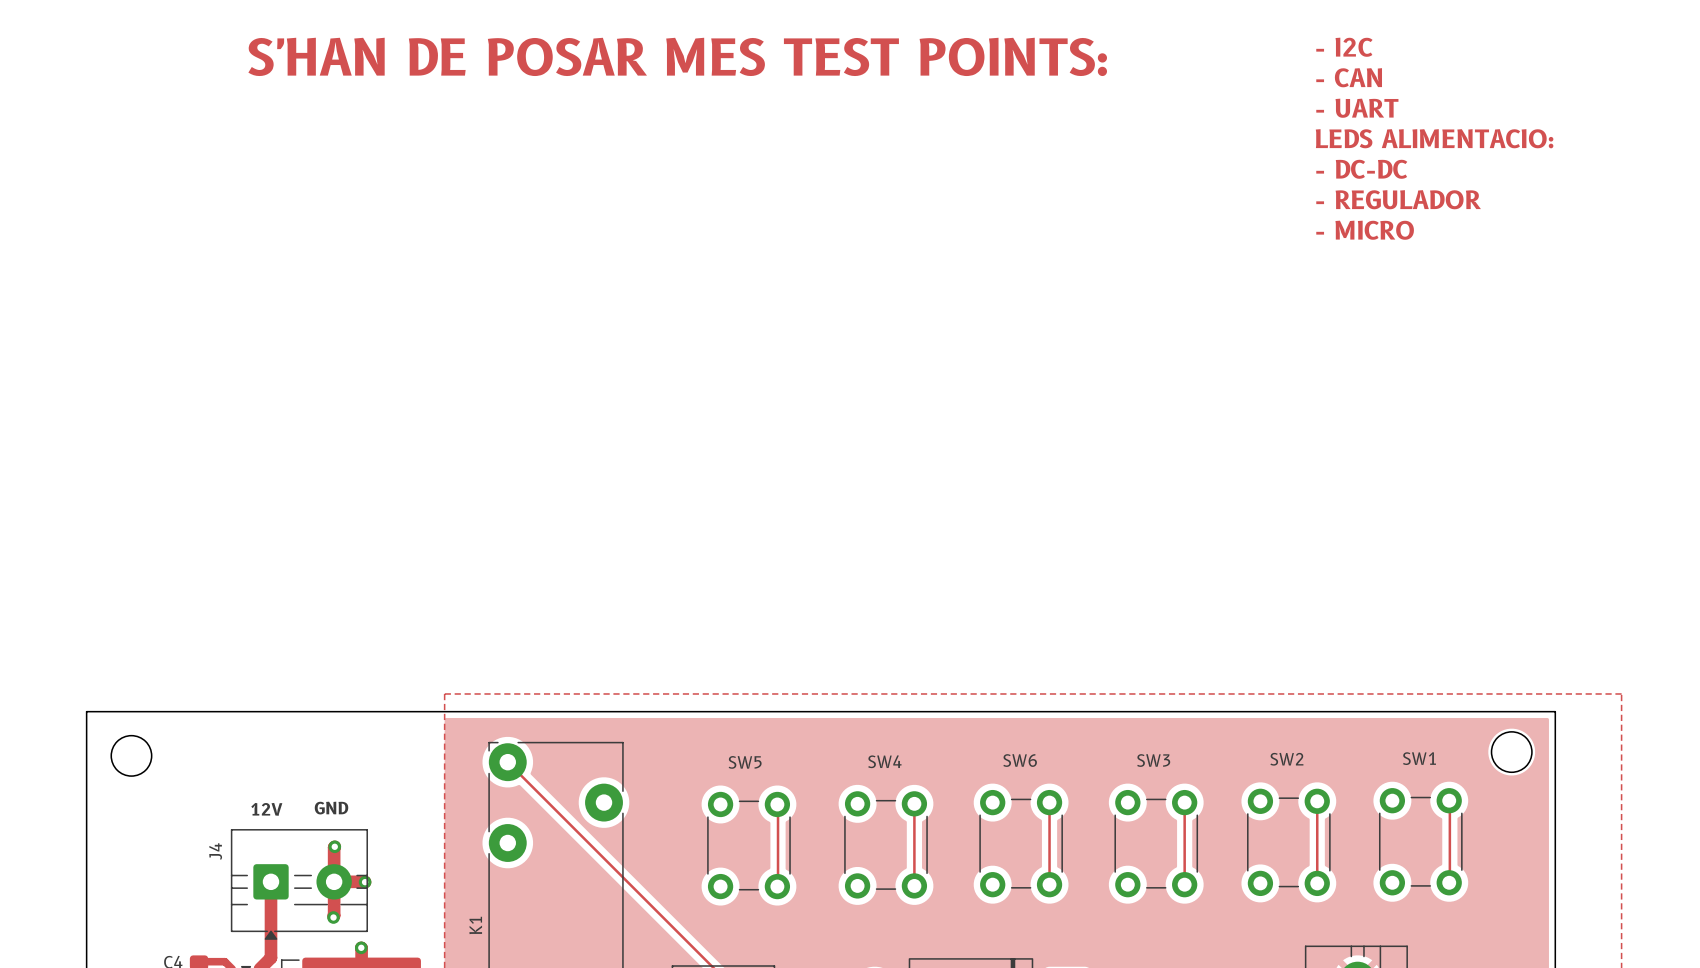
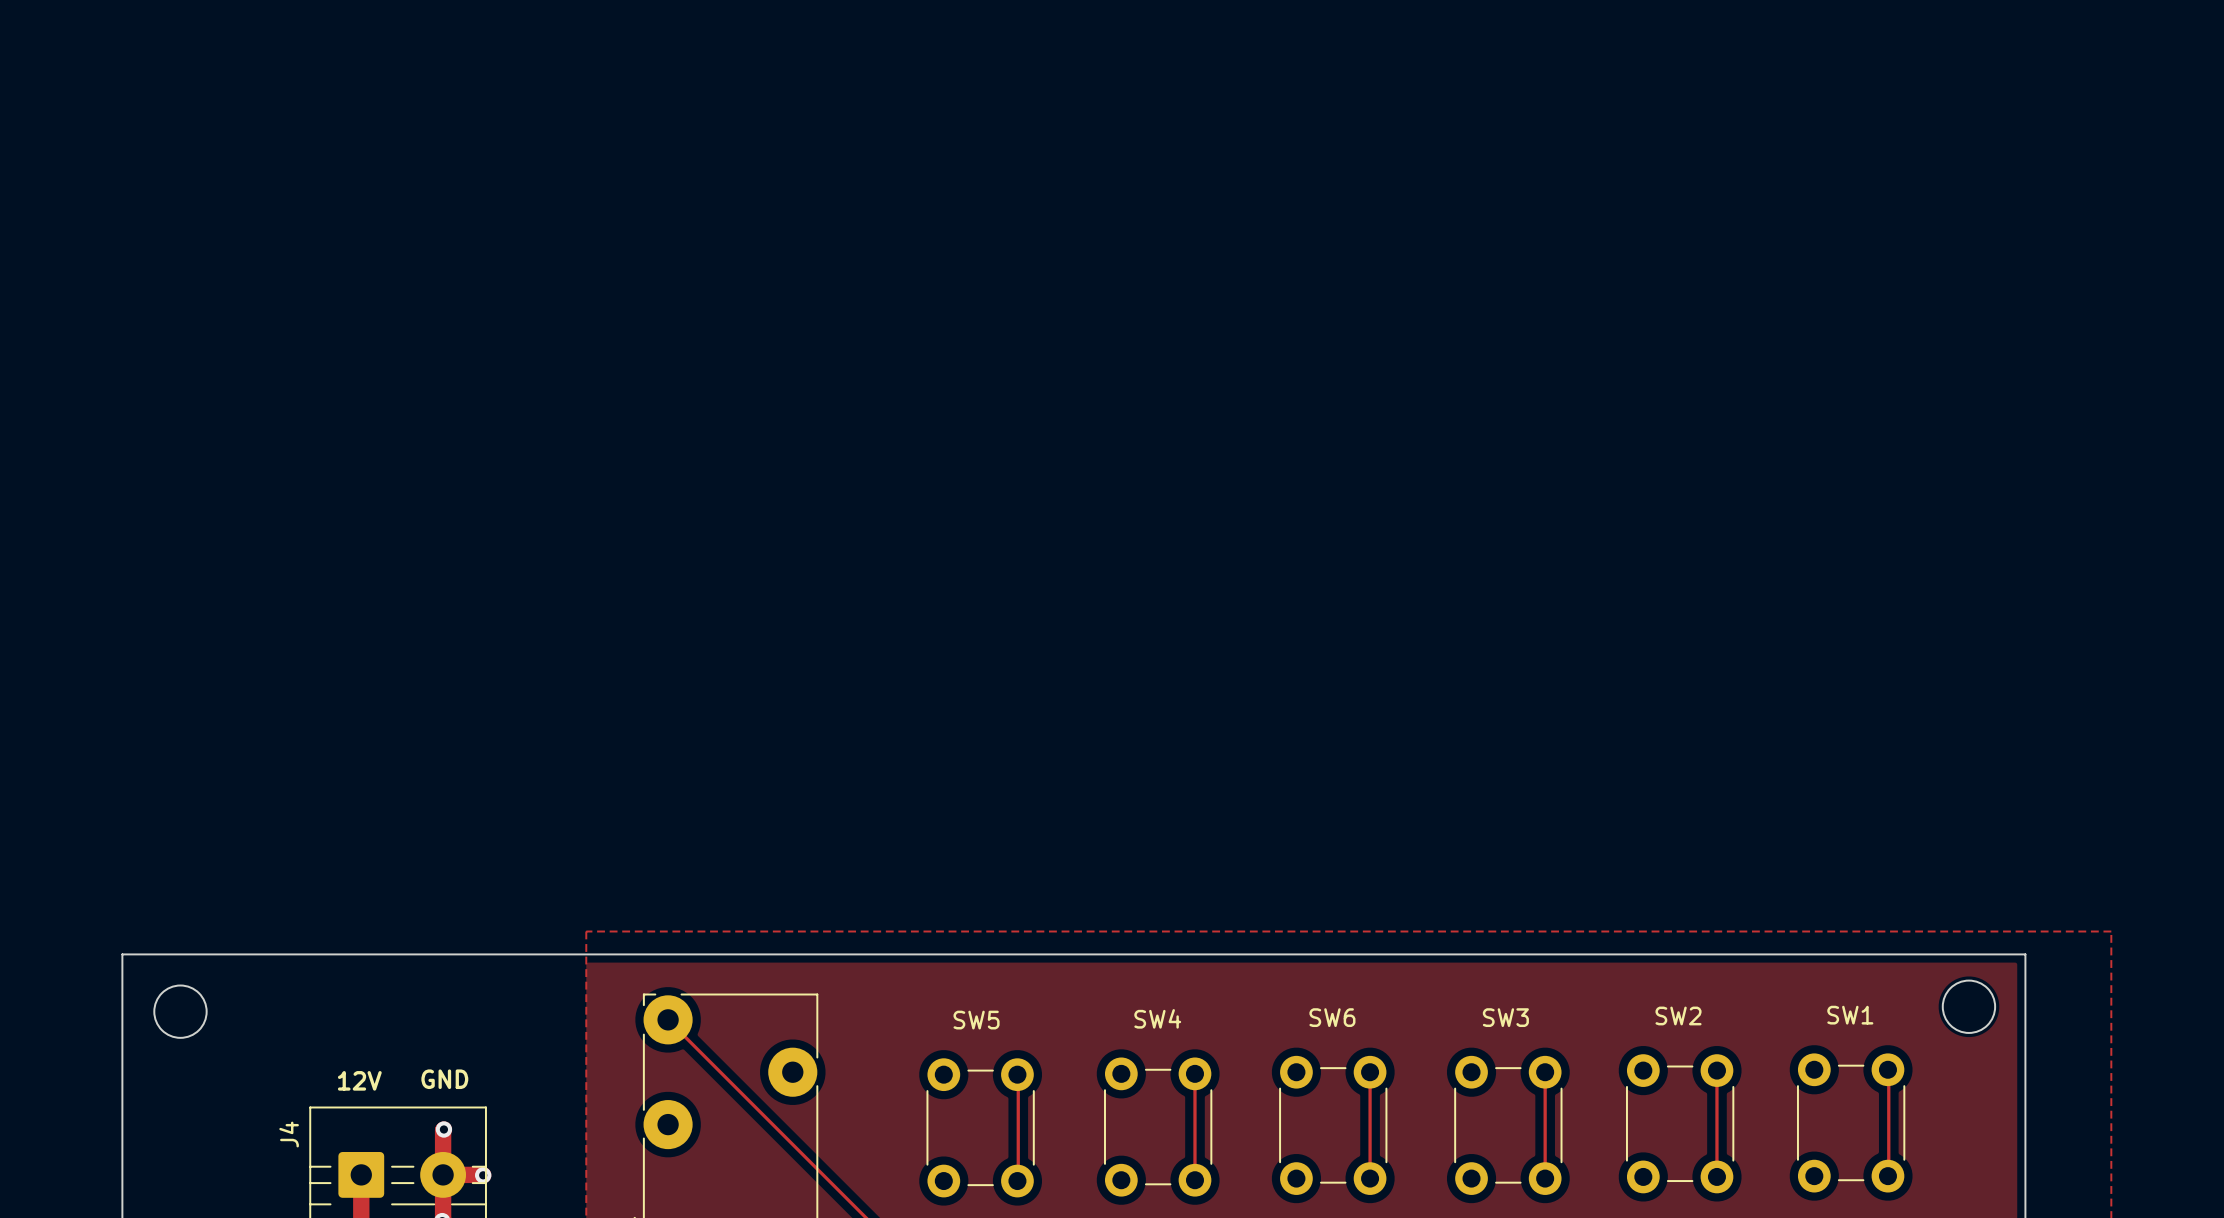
text: - I2C (1344, 47) -> none
text: S'HAN DE POSAR MES TEST POINTS: (677, 56) -> none
text: - CAN (1349, 77) -> none
text: - UART (1357, 108) -> none
text: LEDS ALIMENTACIO: (1434, 138) -> none
text: - DC-DC (1361, 169) -> none
text: - REGULADOR (1398, 199) -> none
text: - MICRO (1365, 230) -> none

